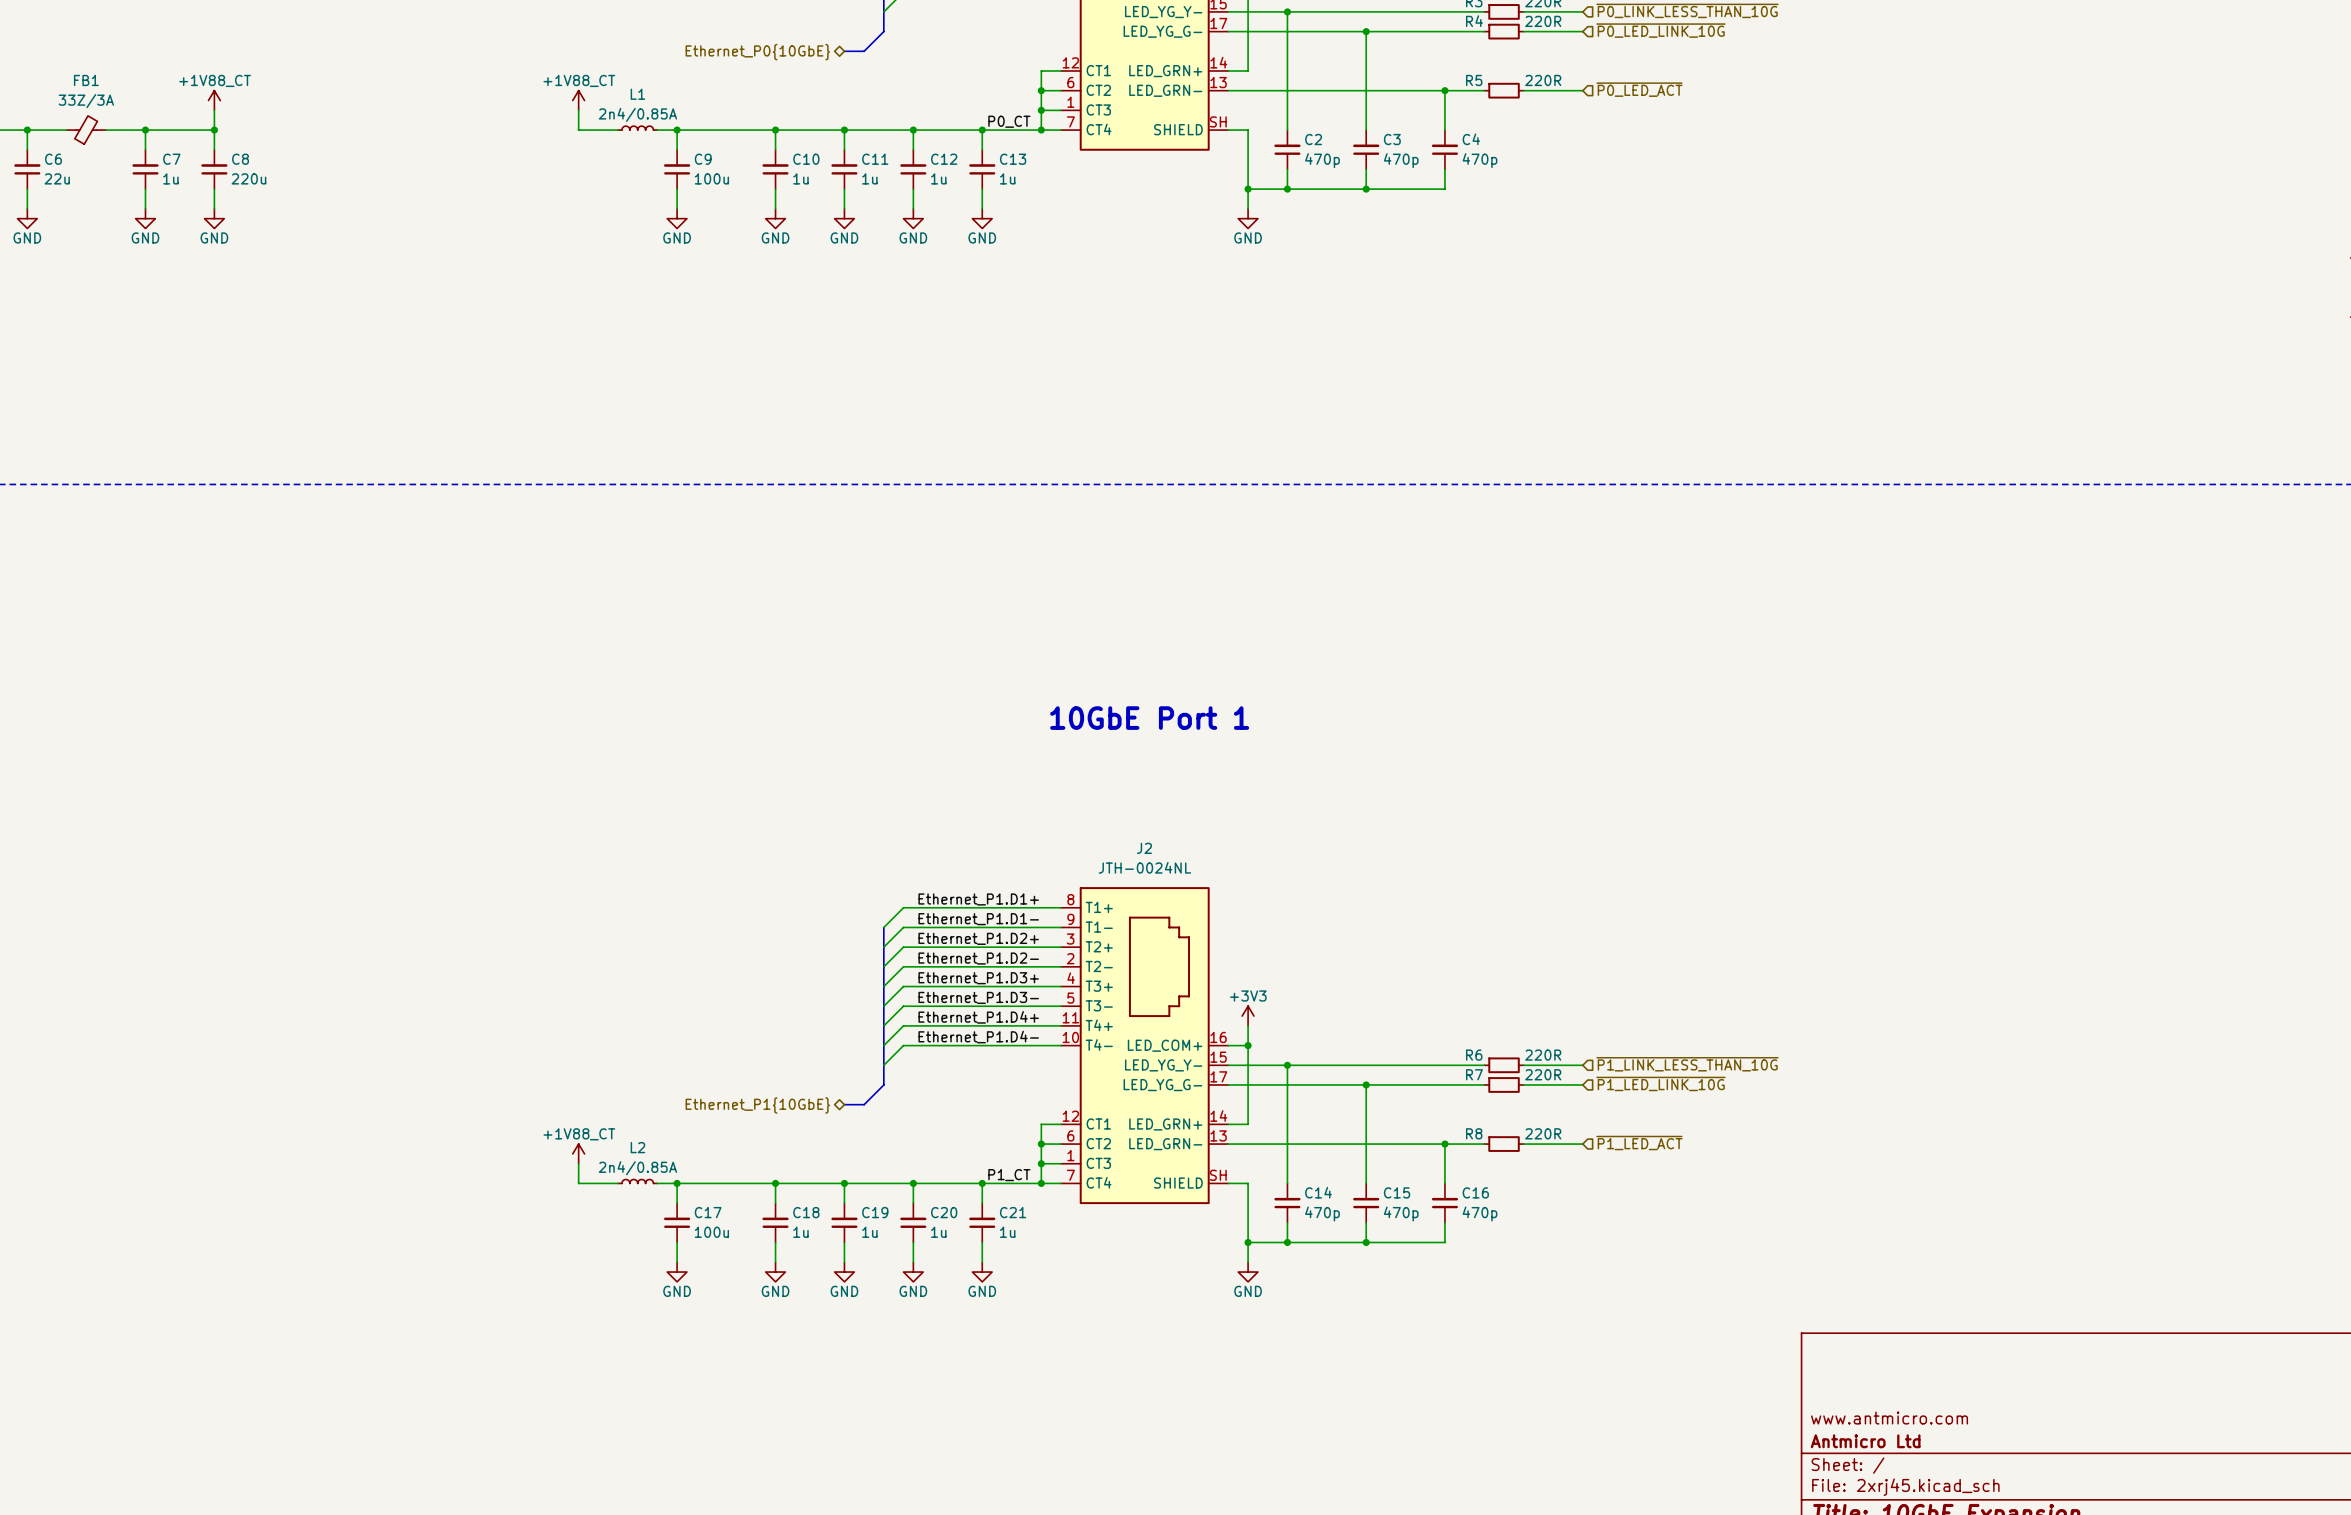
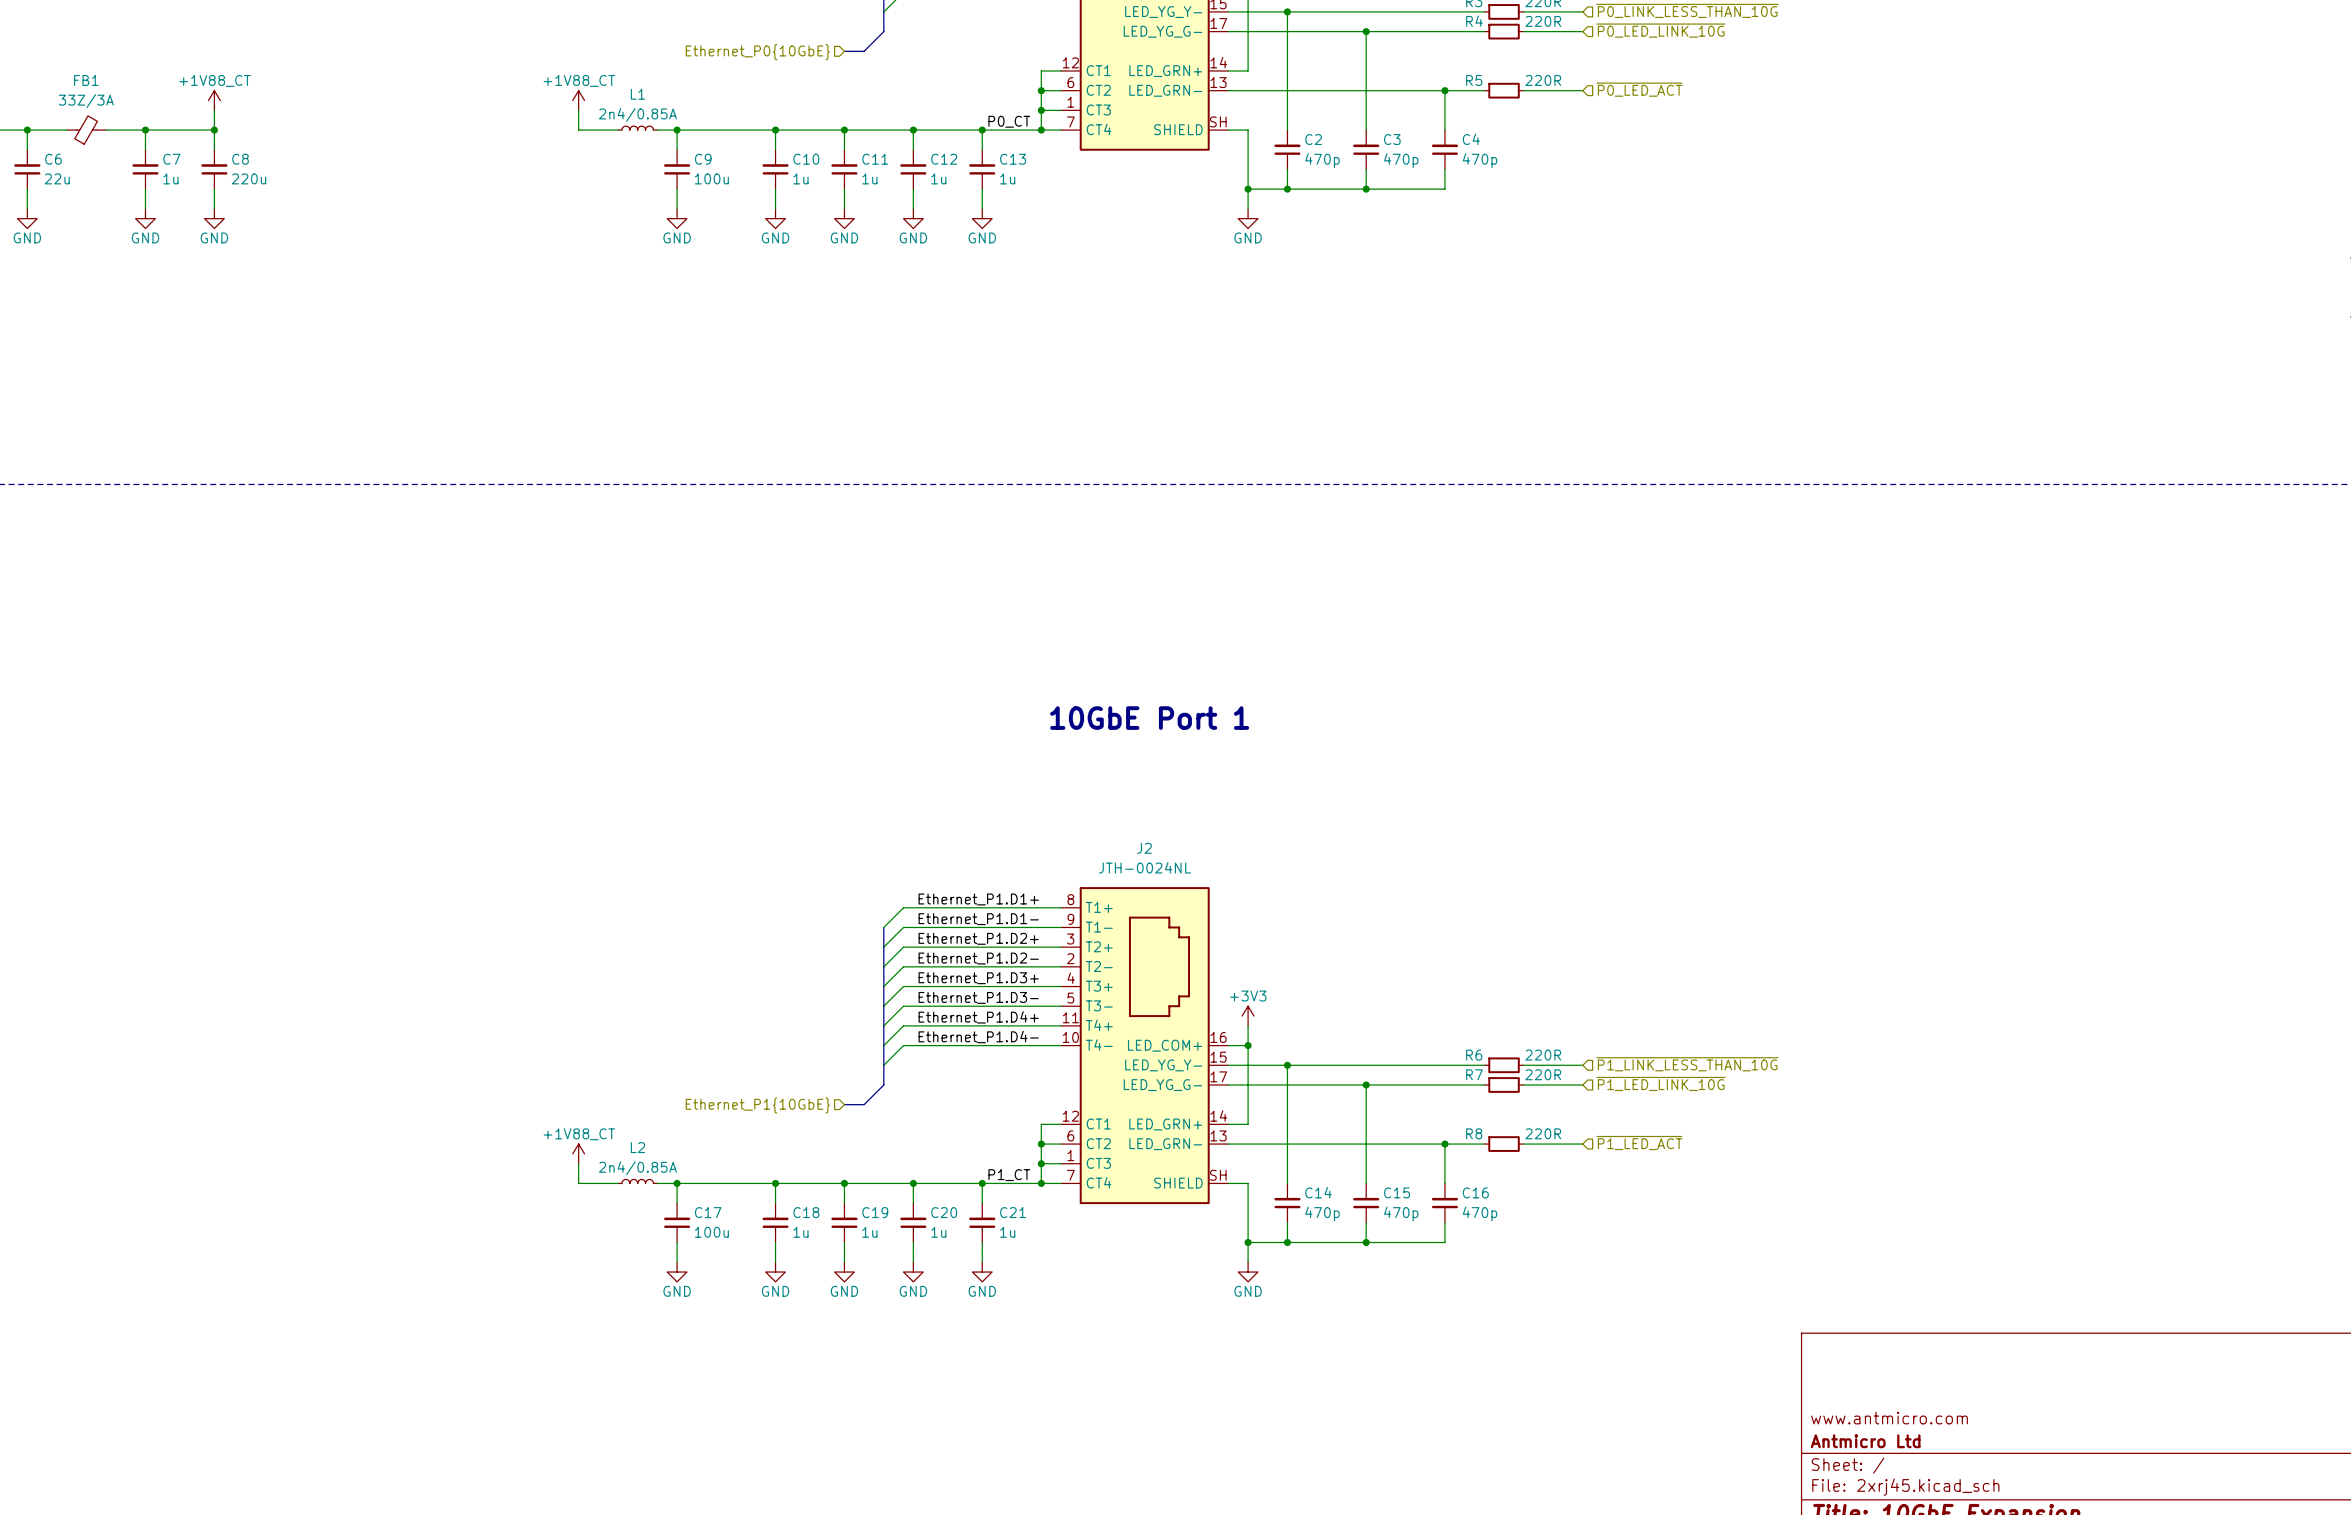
hierarchical label shape: bidirectional (757, 52) -> input (757, 52)
hierarchical label shape: bidirectional (757, 1105) -> input (757, 1105)

